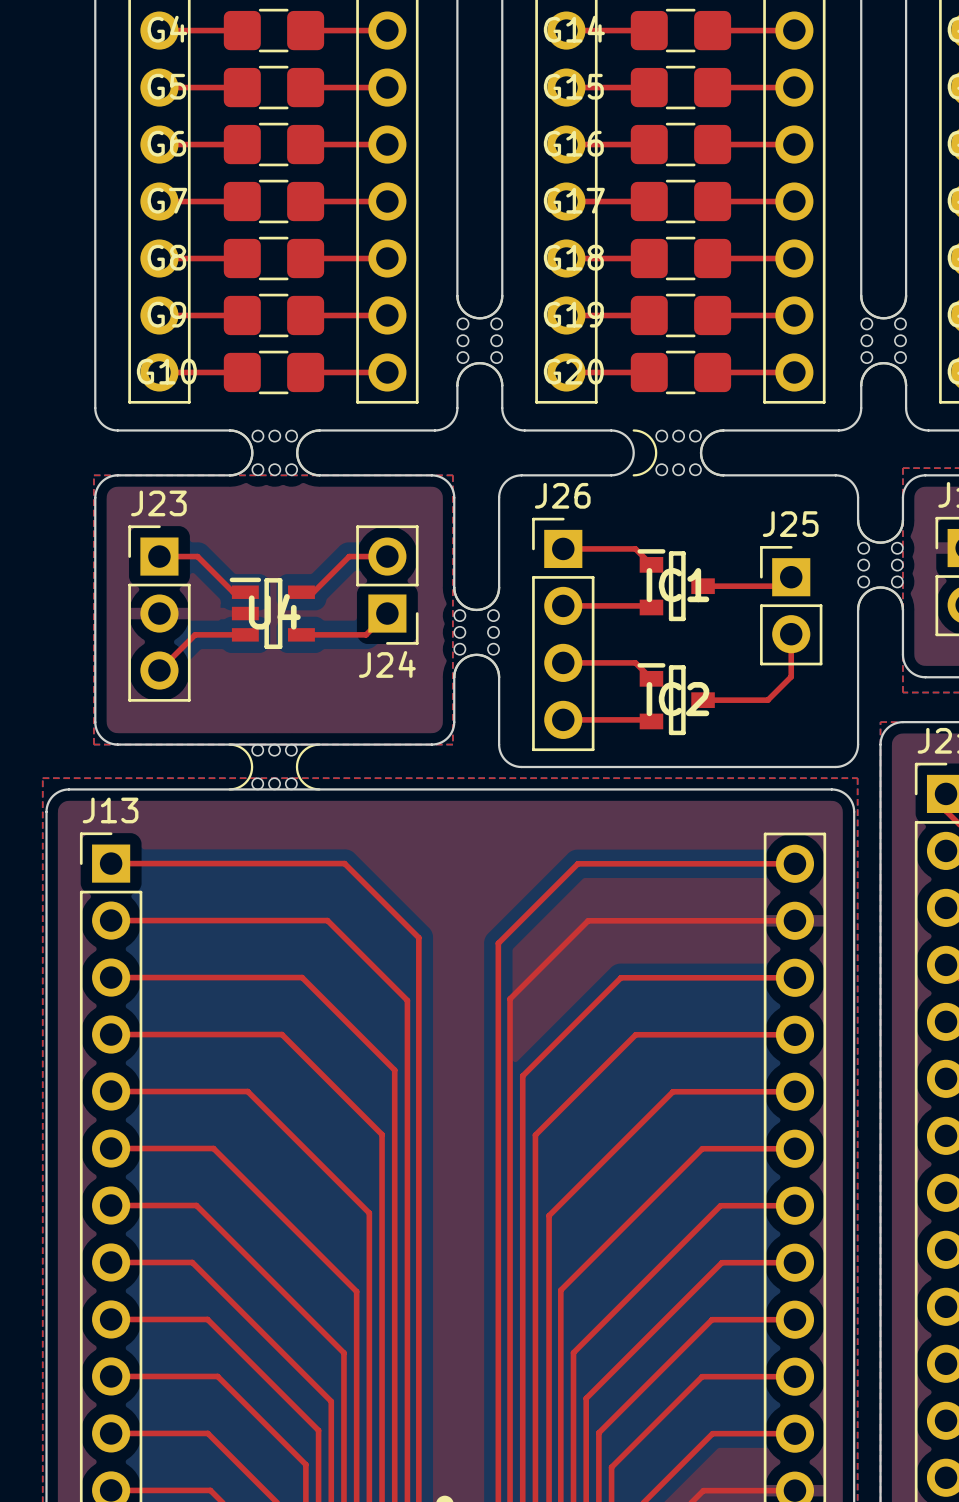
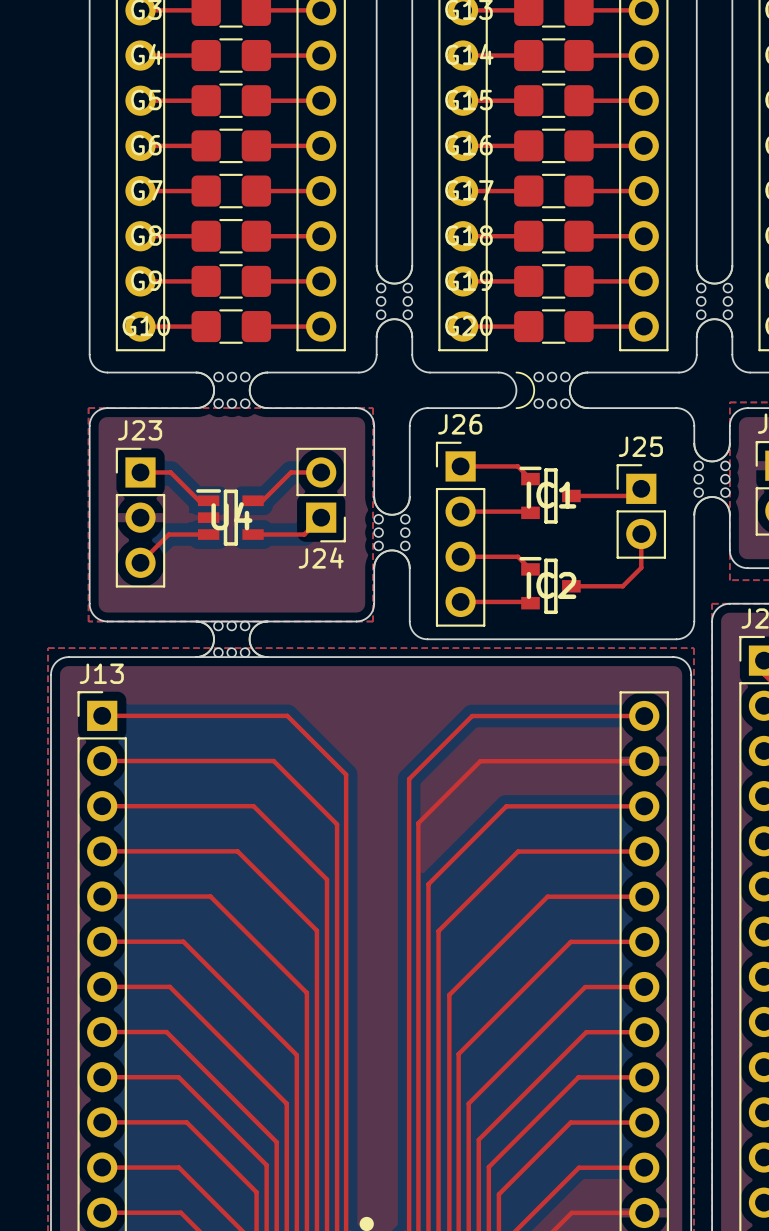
board edge: none -> (196, 621) (208, 626) (214, 639) (208, 651) (196, 657)
board edge: none -> (267, 621) (254, 626) (249, 639) (254, 651) (267, 657)

